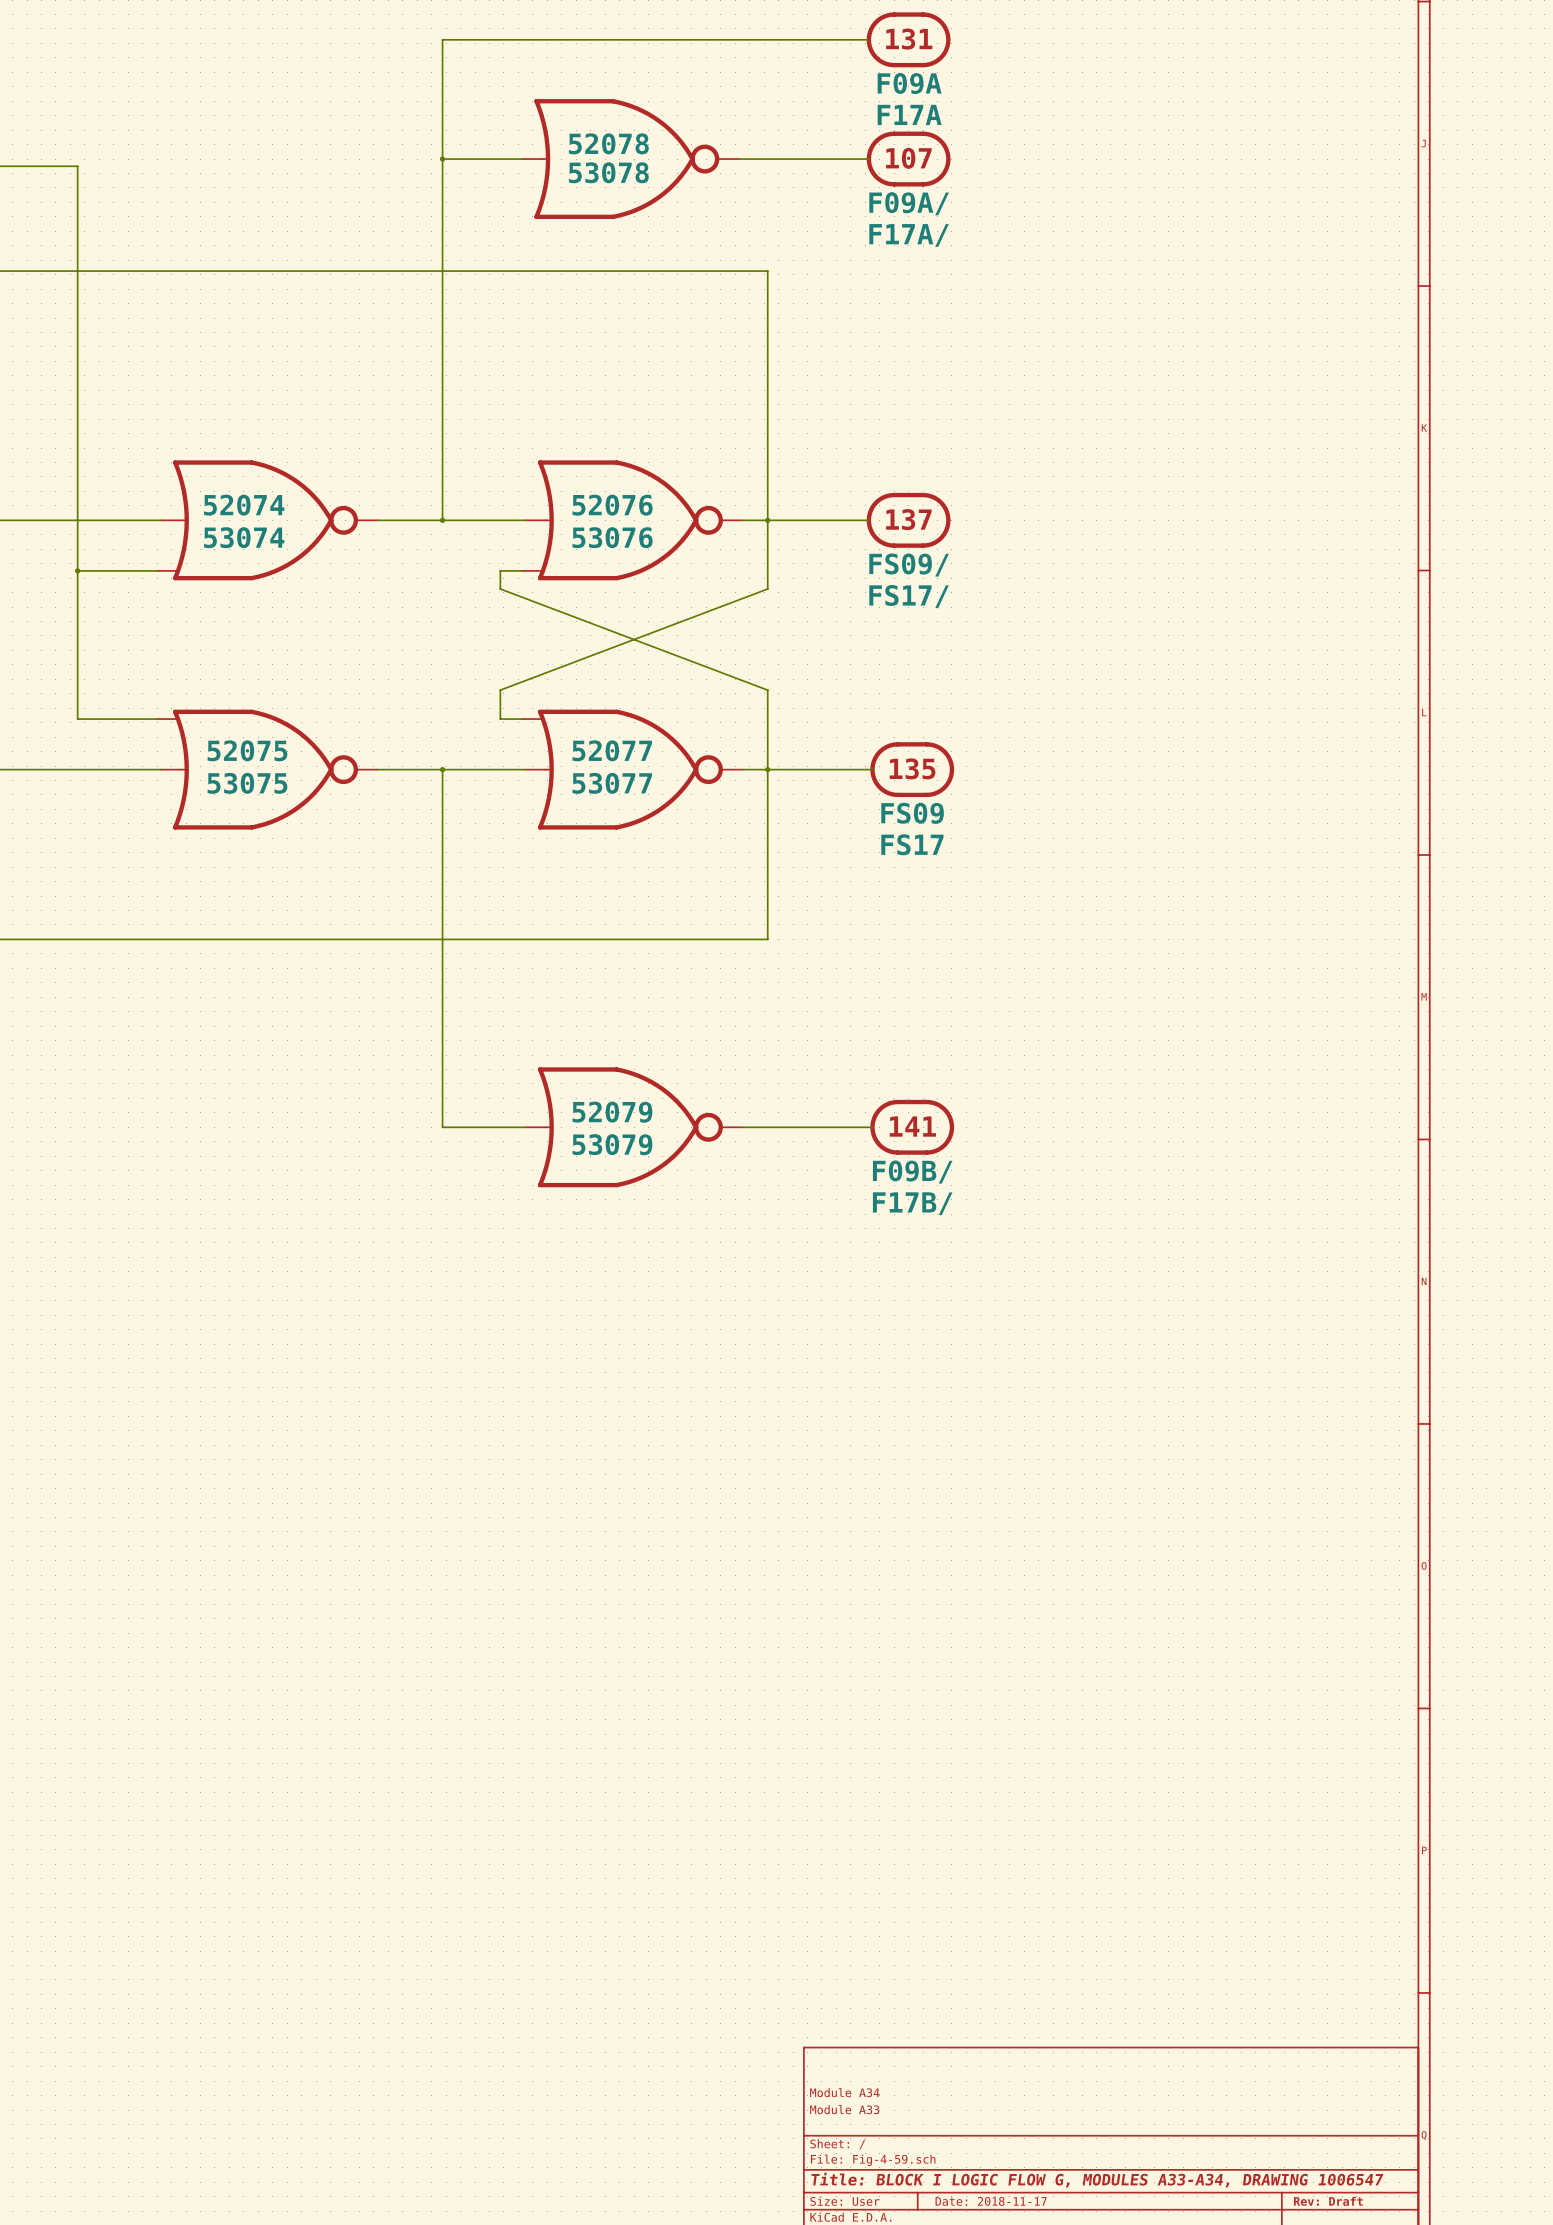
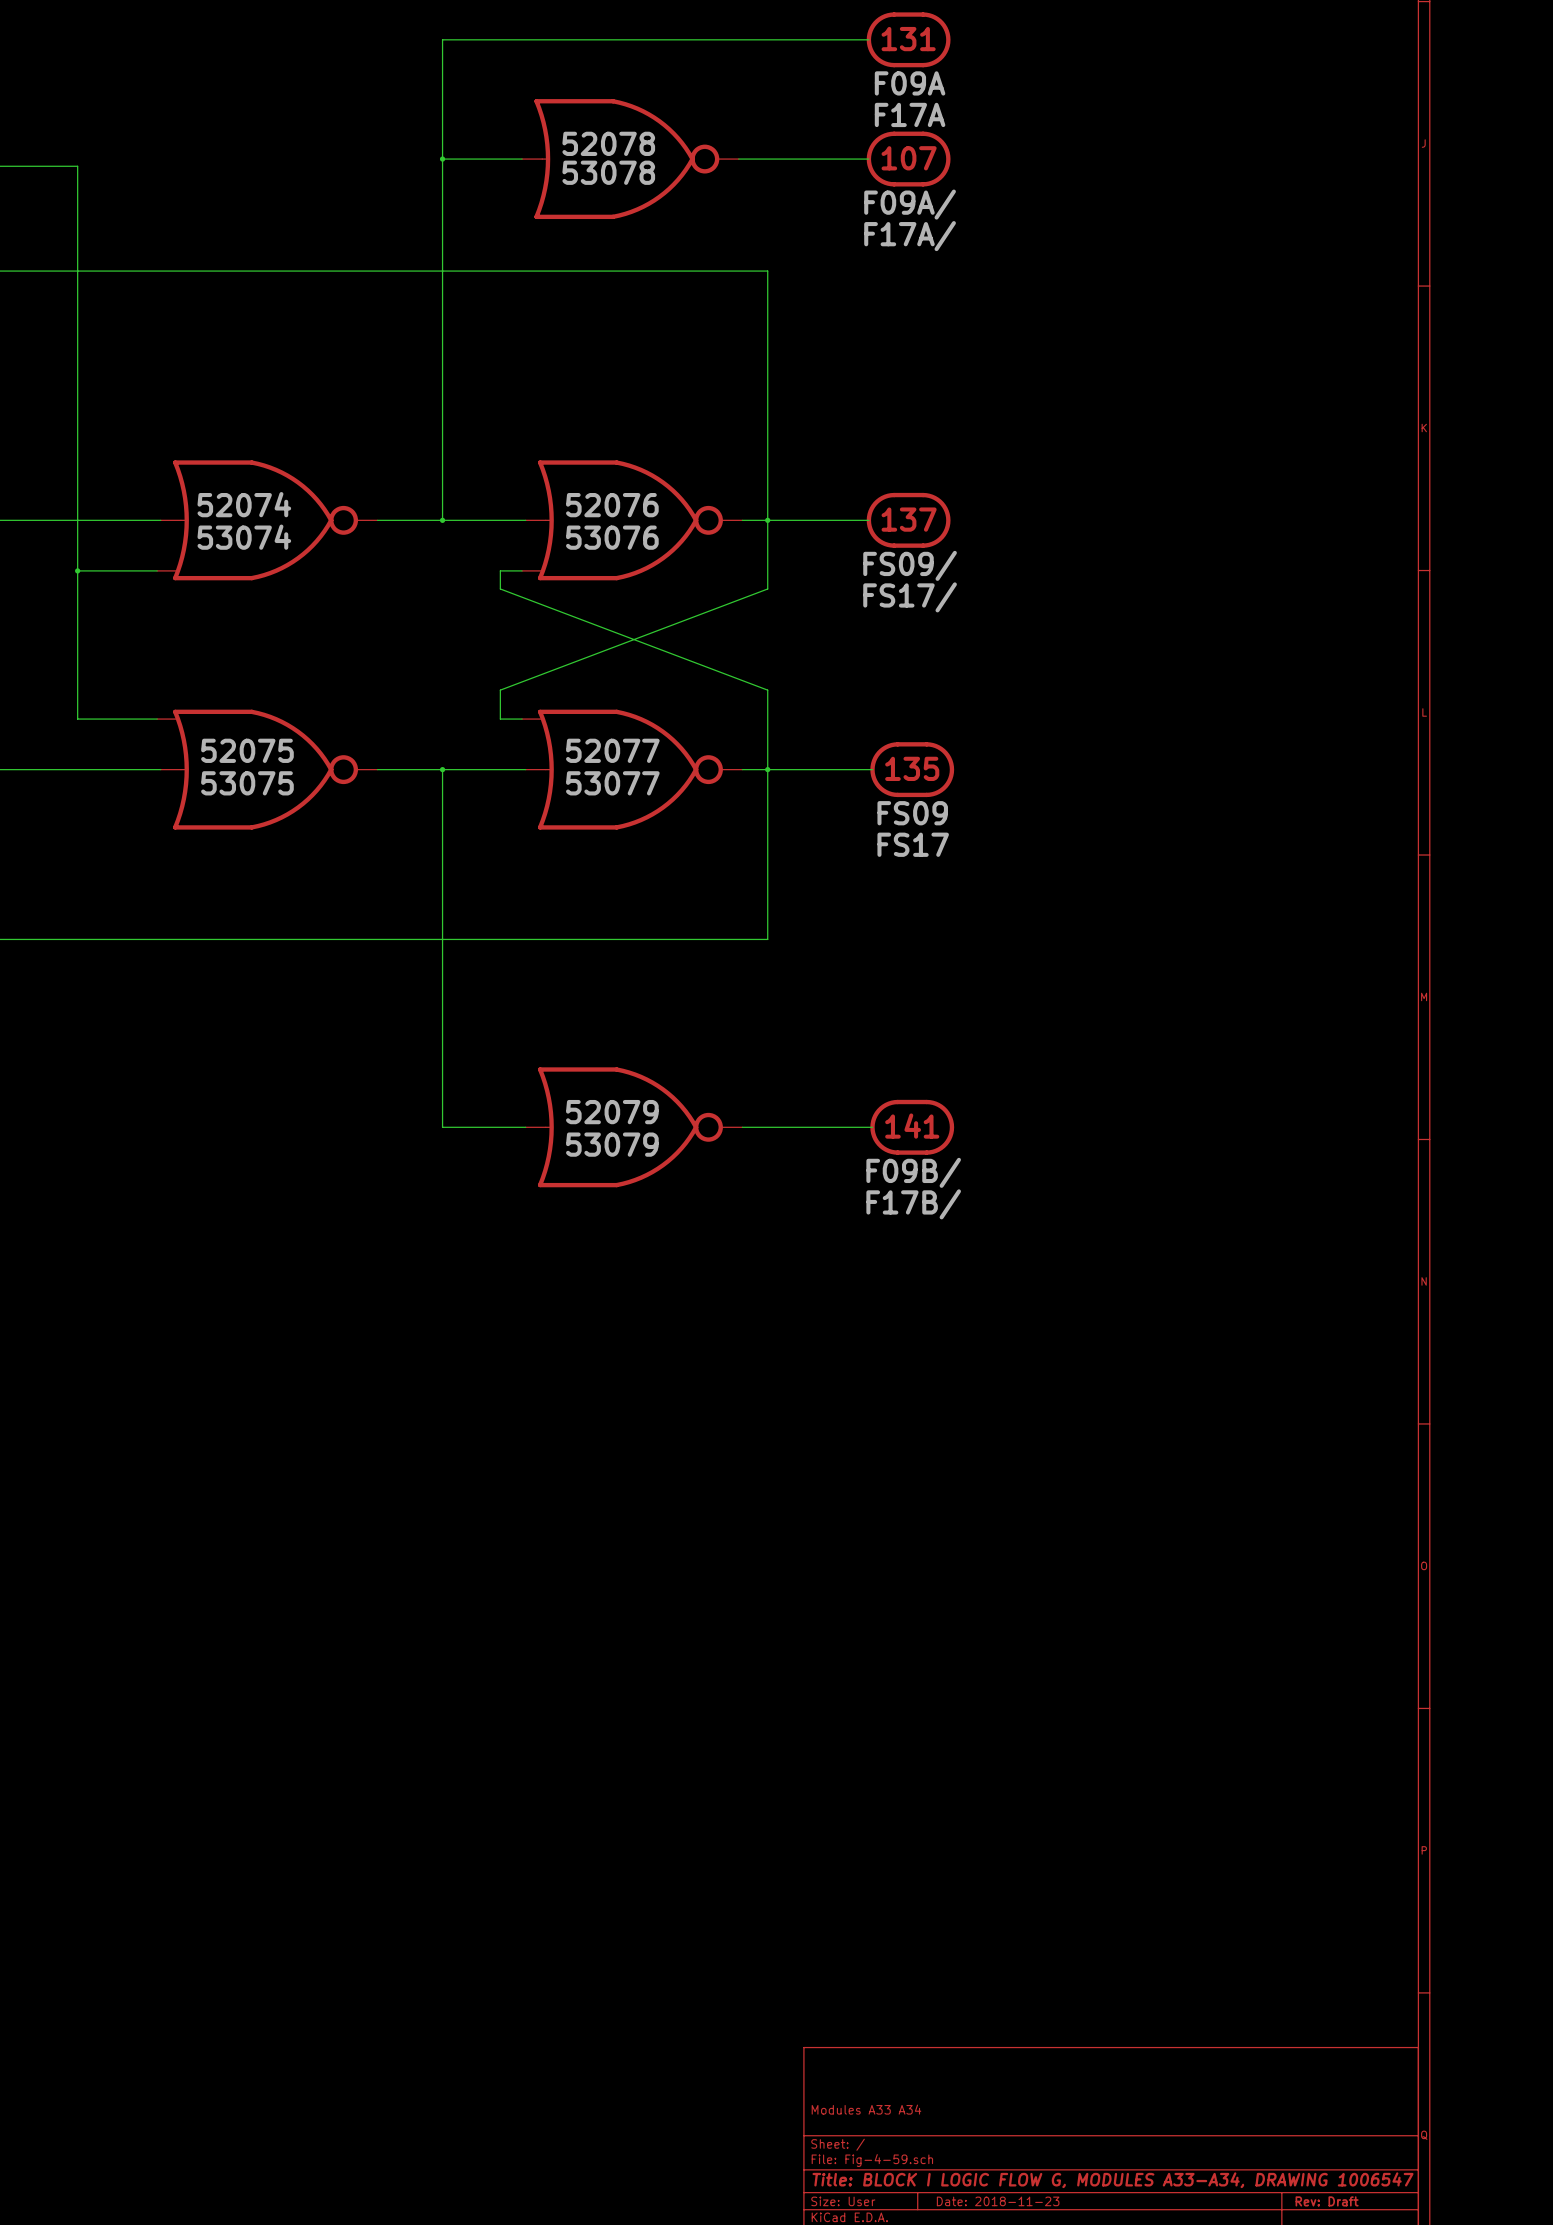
title block: Module A34 (844, 2092) -> none
title block: Module A33 (844, 2109) -> Modules A33 A34 (866, 2109)
title block: Date: 2018-11-17 (991, 2201) -> Date: 2018-11-23 (998, 2201)

